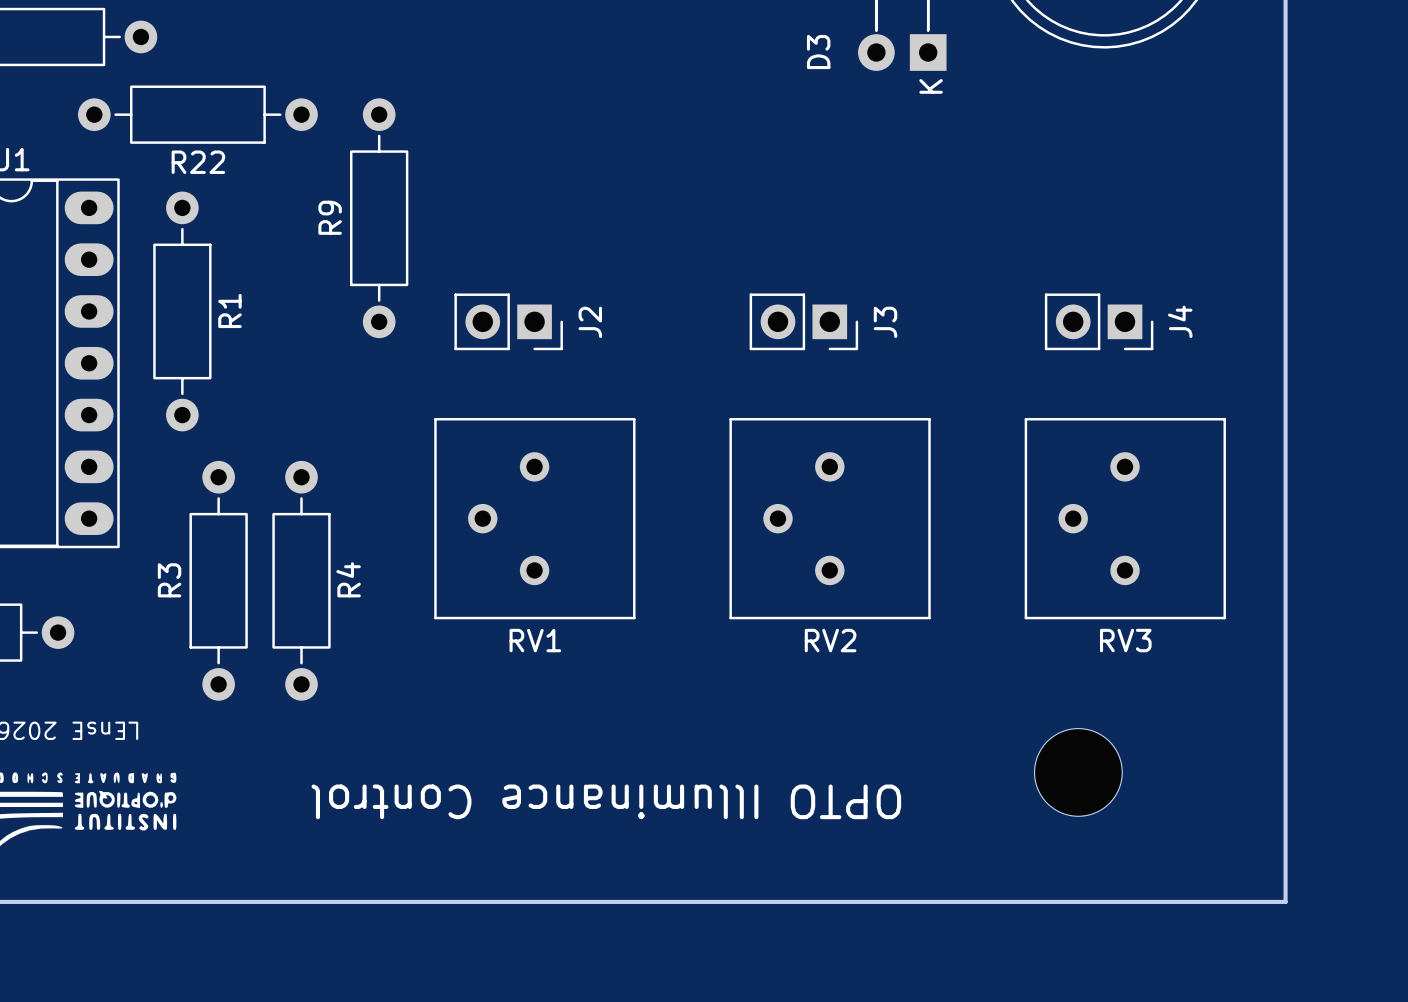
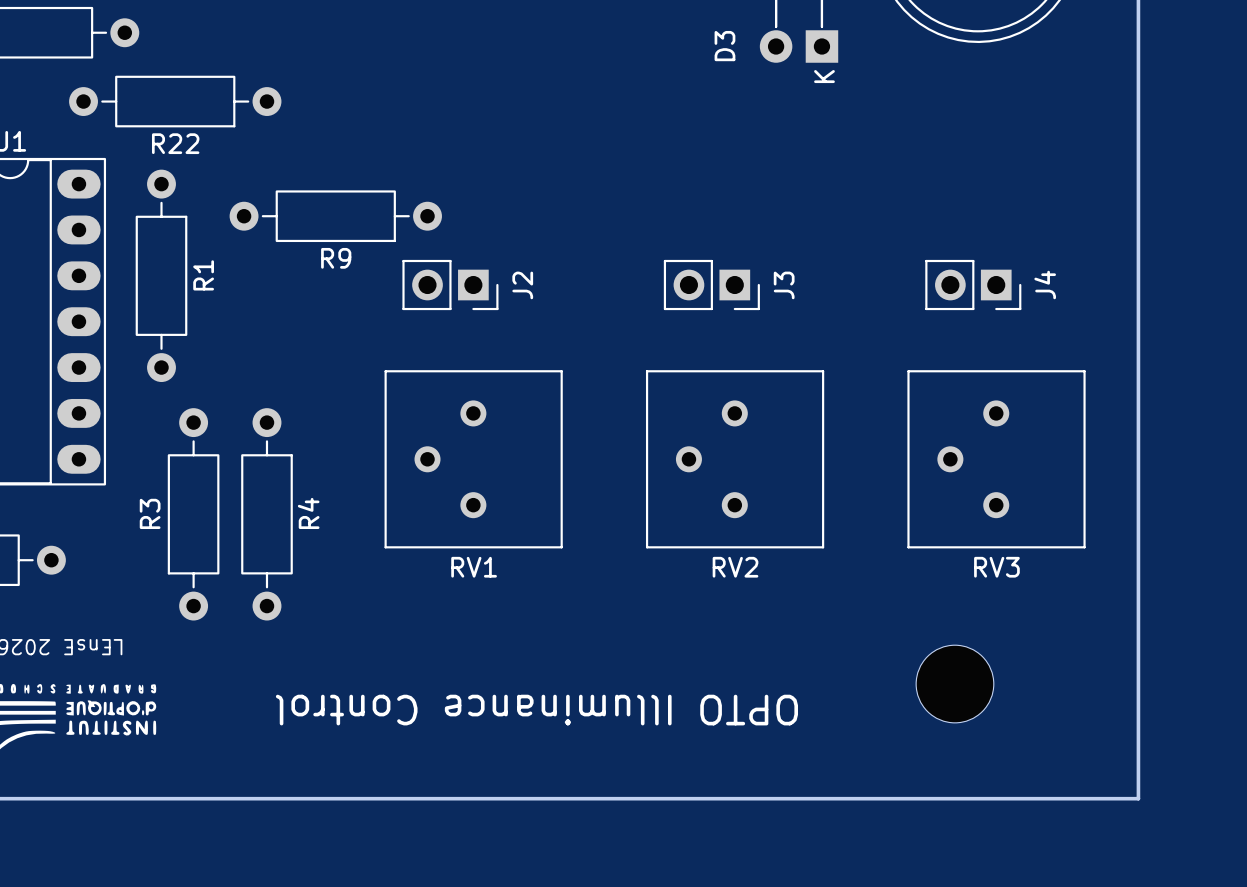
R9 name position: R9 (330, 217) -> R9 (336, 258)
R9 rotation: 0° (379, 218) -> 90° clockwise (335, 216)

